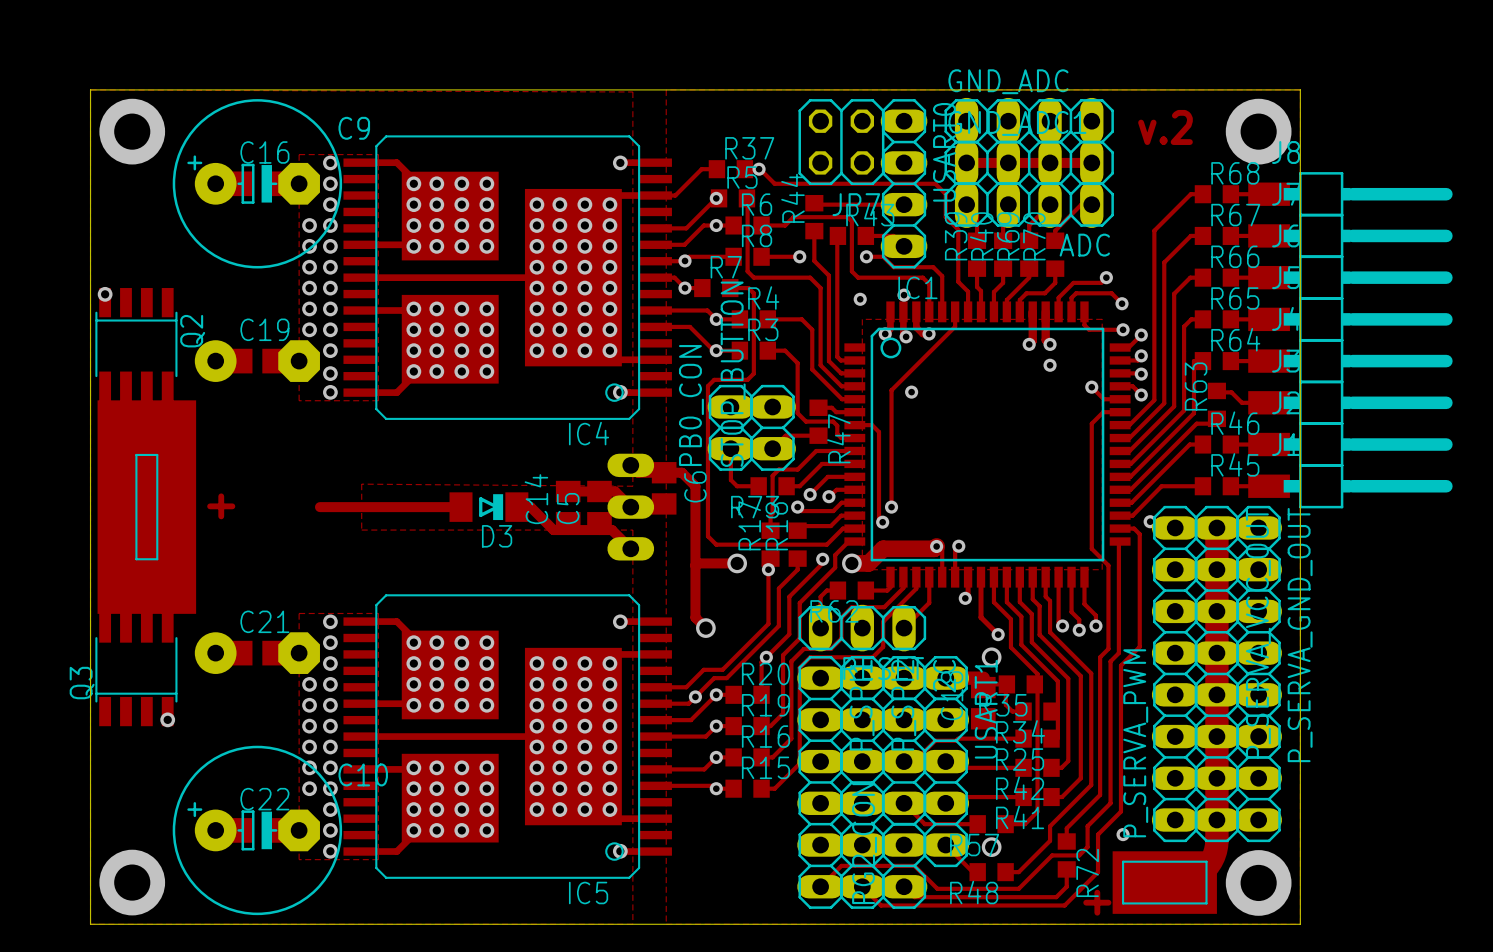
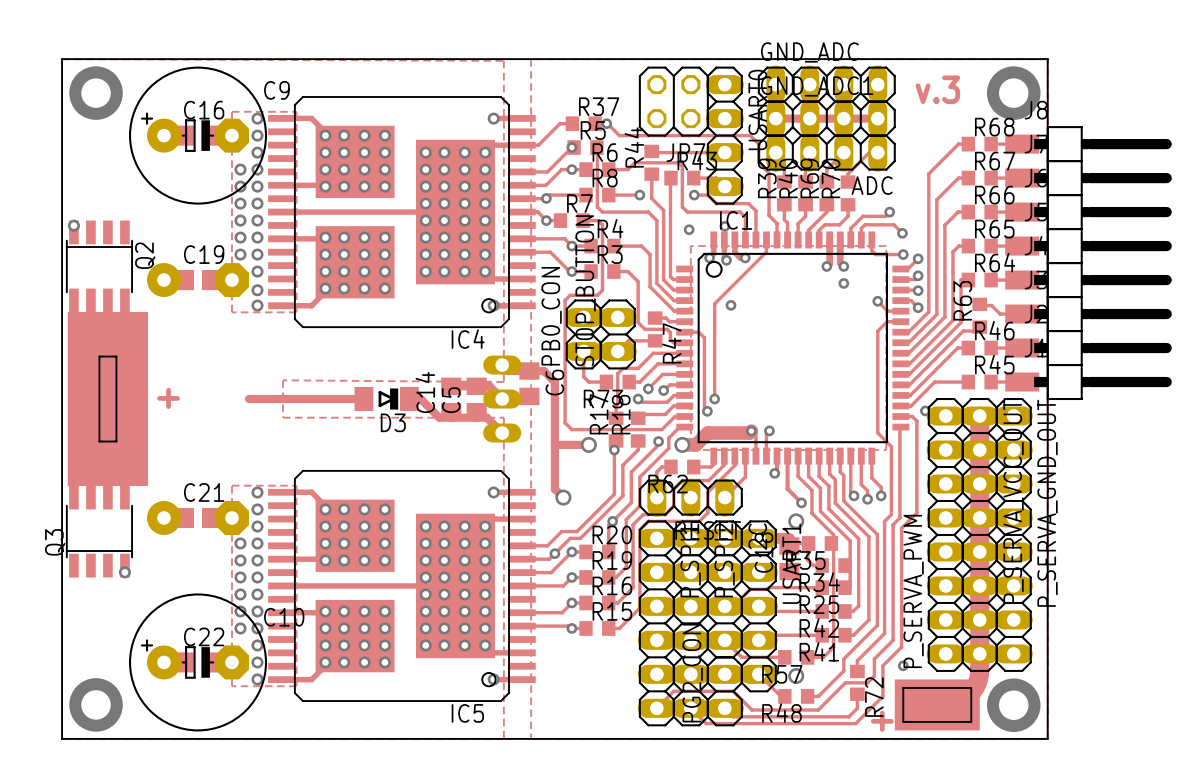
text: v.2 (1165, 127) -> v.3 (937, 89)

